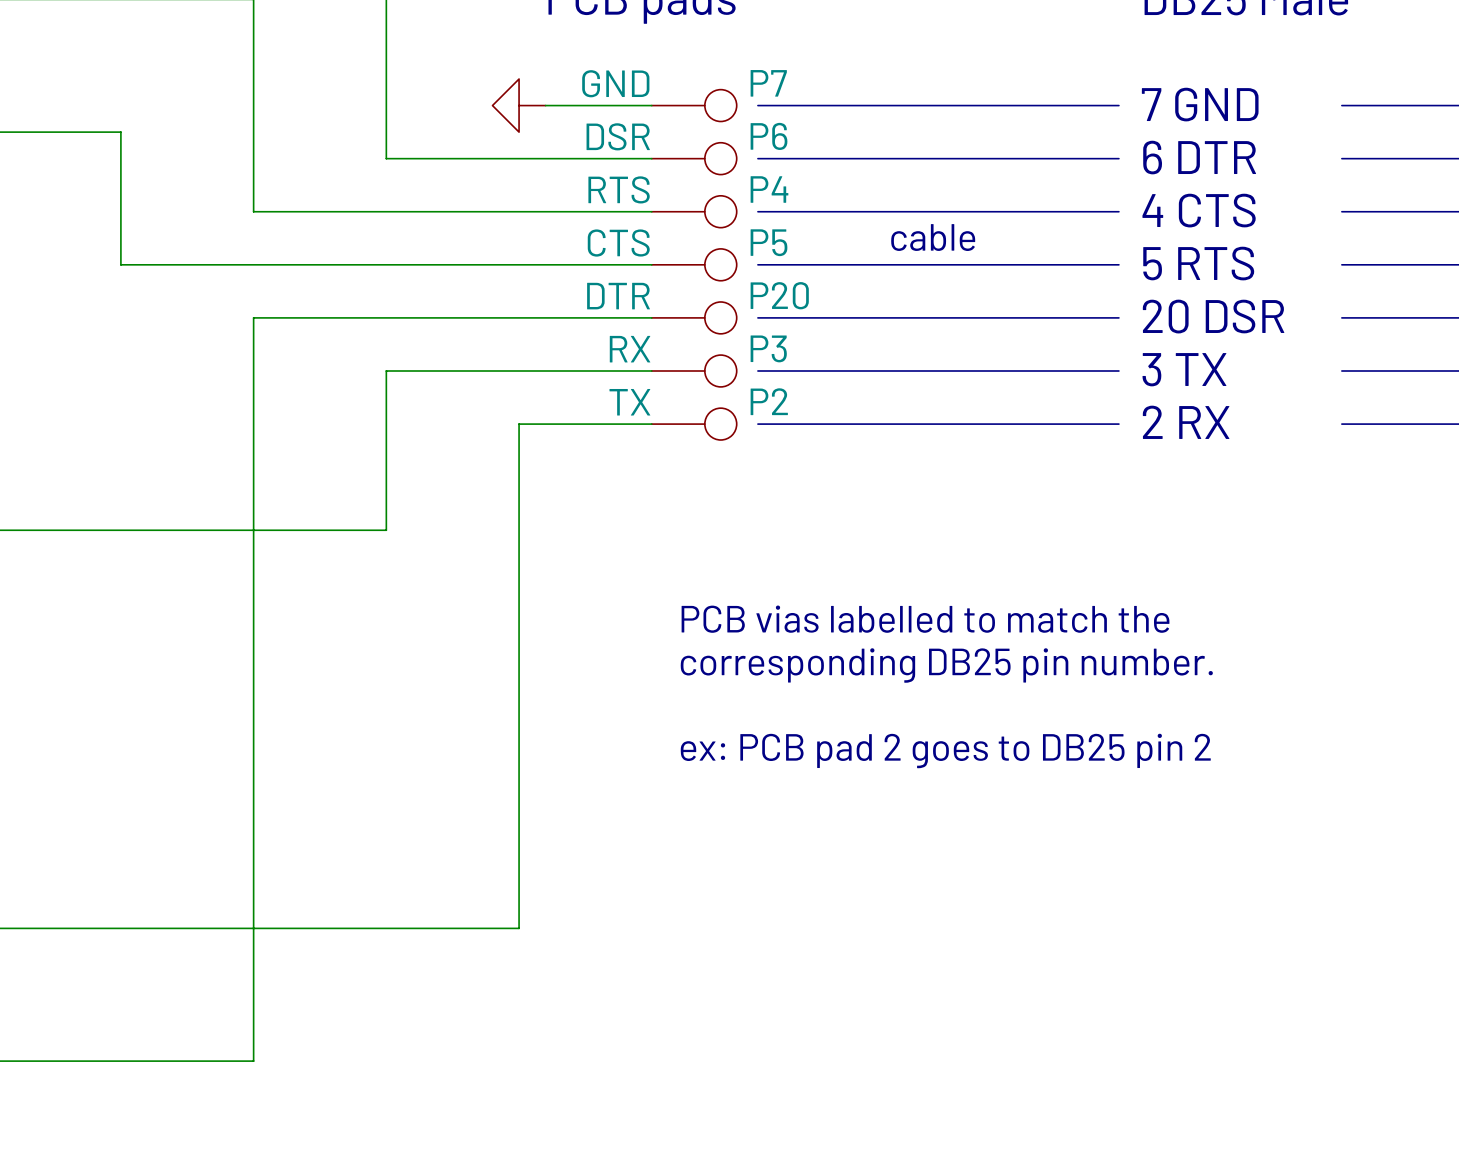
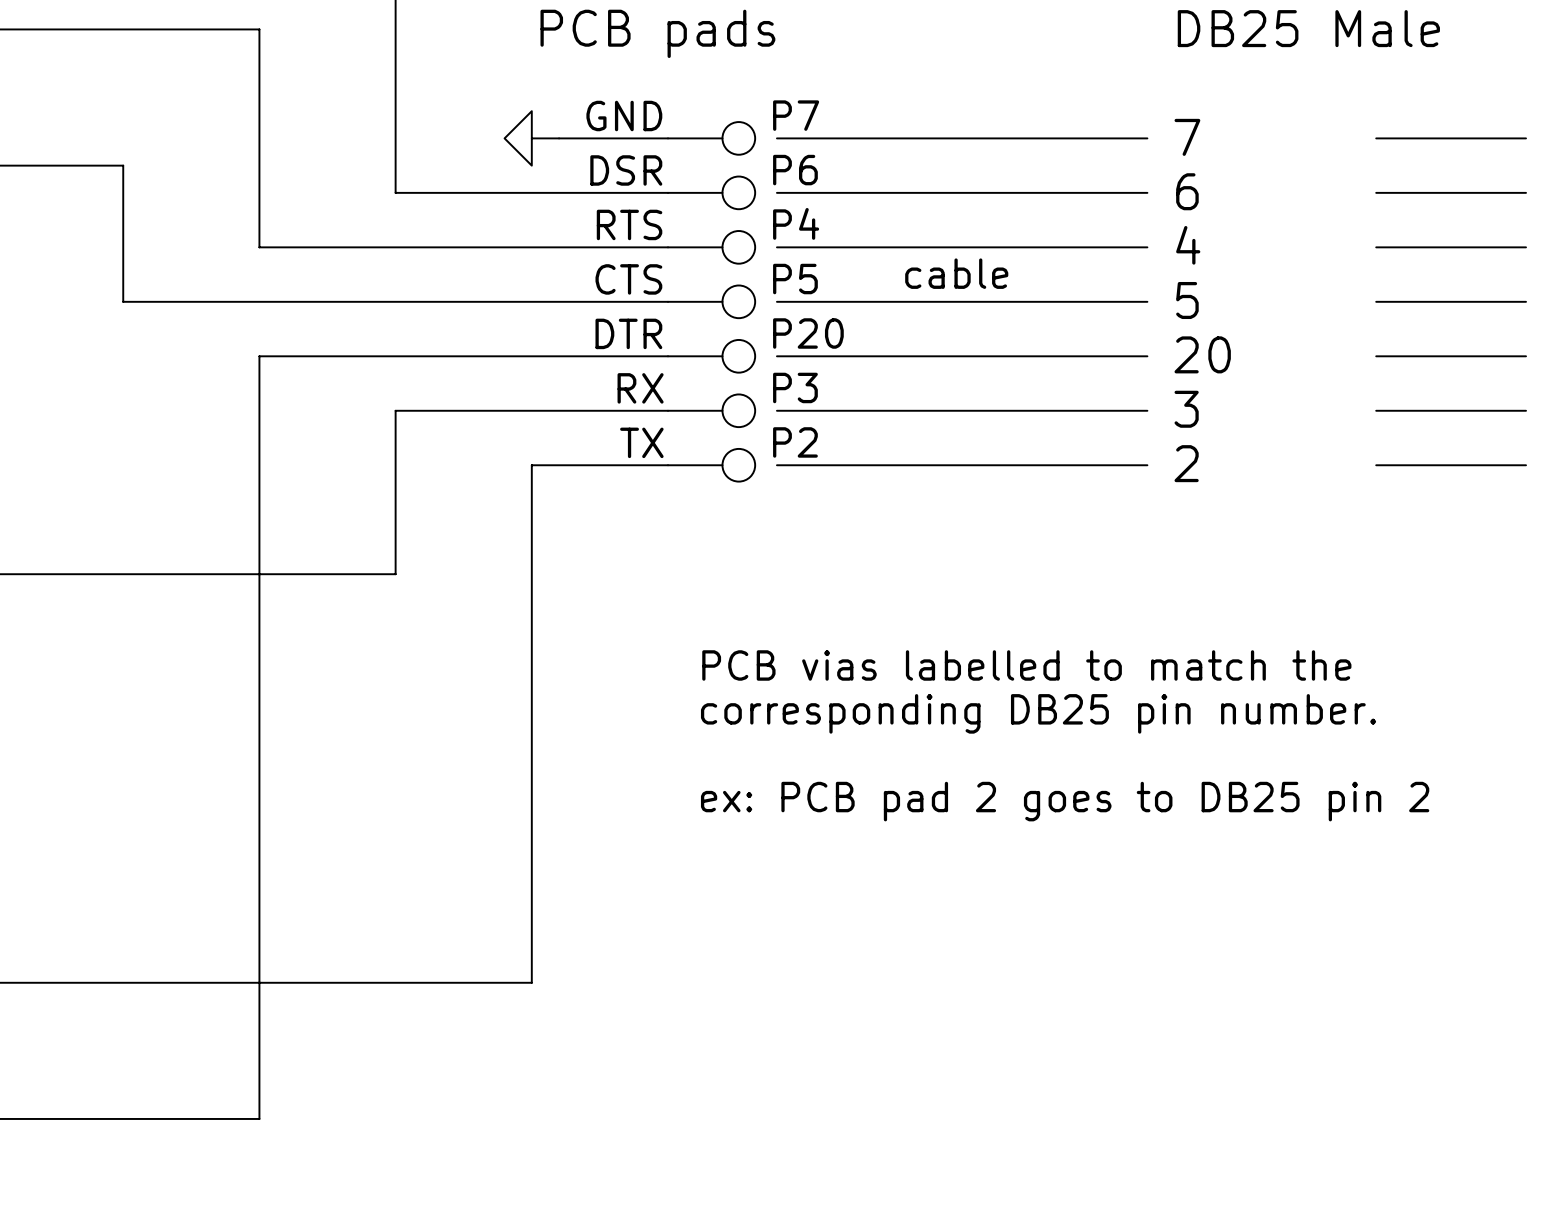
text: 7 GND (1200, 104) -> 7 (1187, 137)
text: 6 DTR (1199, 157) -> 6 (1187, 191)
text: 4 CTS (1199, 210) -> 4 (1188, 245)
text: 5 RTS (1198, 263) -> 5 (1187, 300)
text: 20 DSR (1213, 316) -> 20 (1202, 354)
text: 3 TX (1184, 369) -> 3 (1186, 409)
text: 2 RX (1186, 422) -> 2 (1186, 463)

